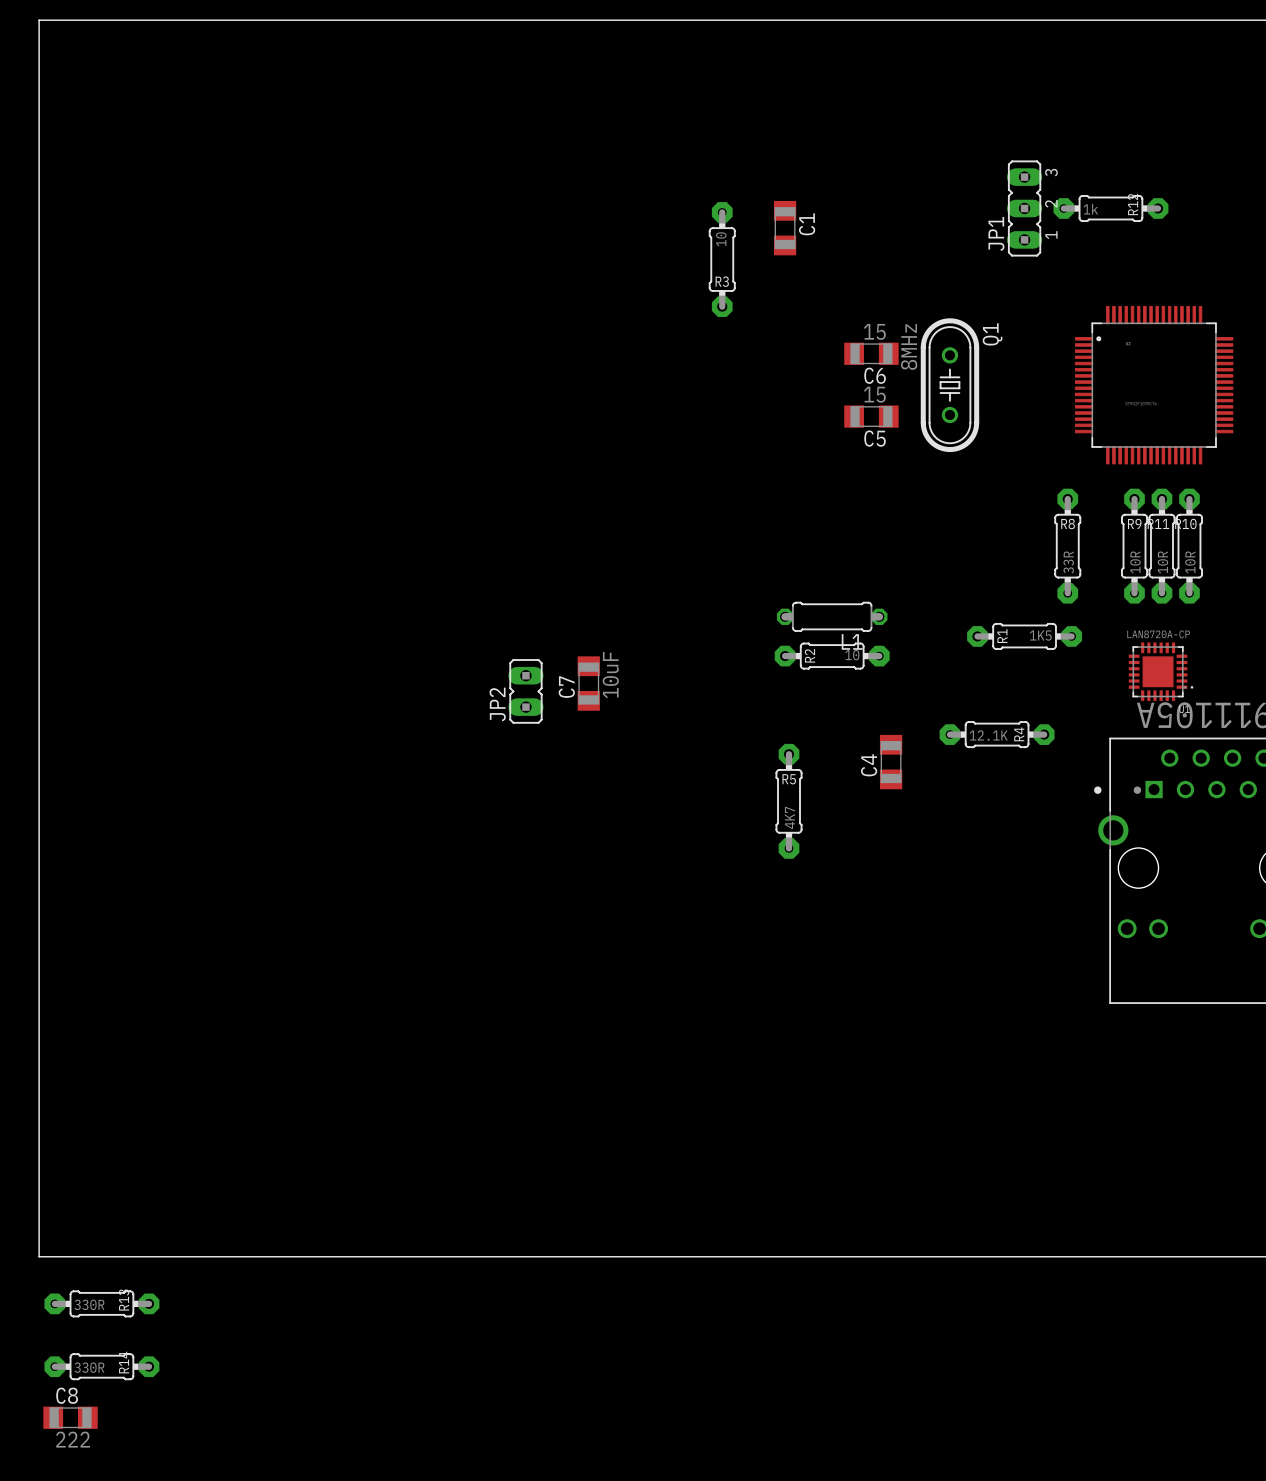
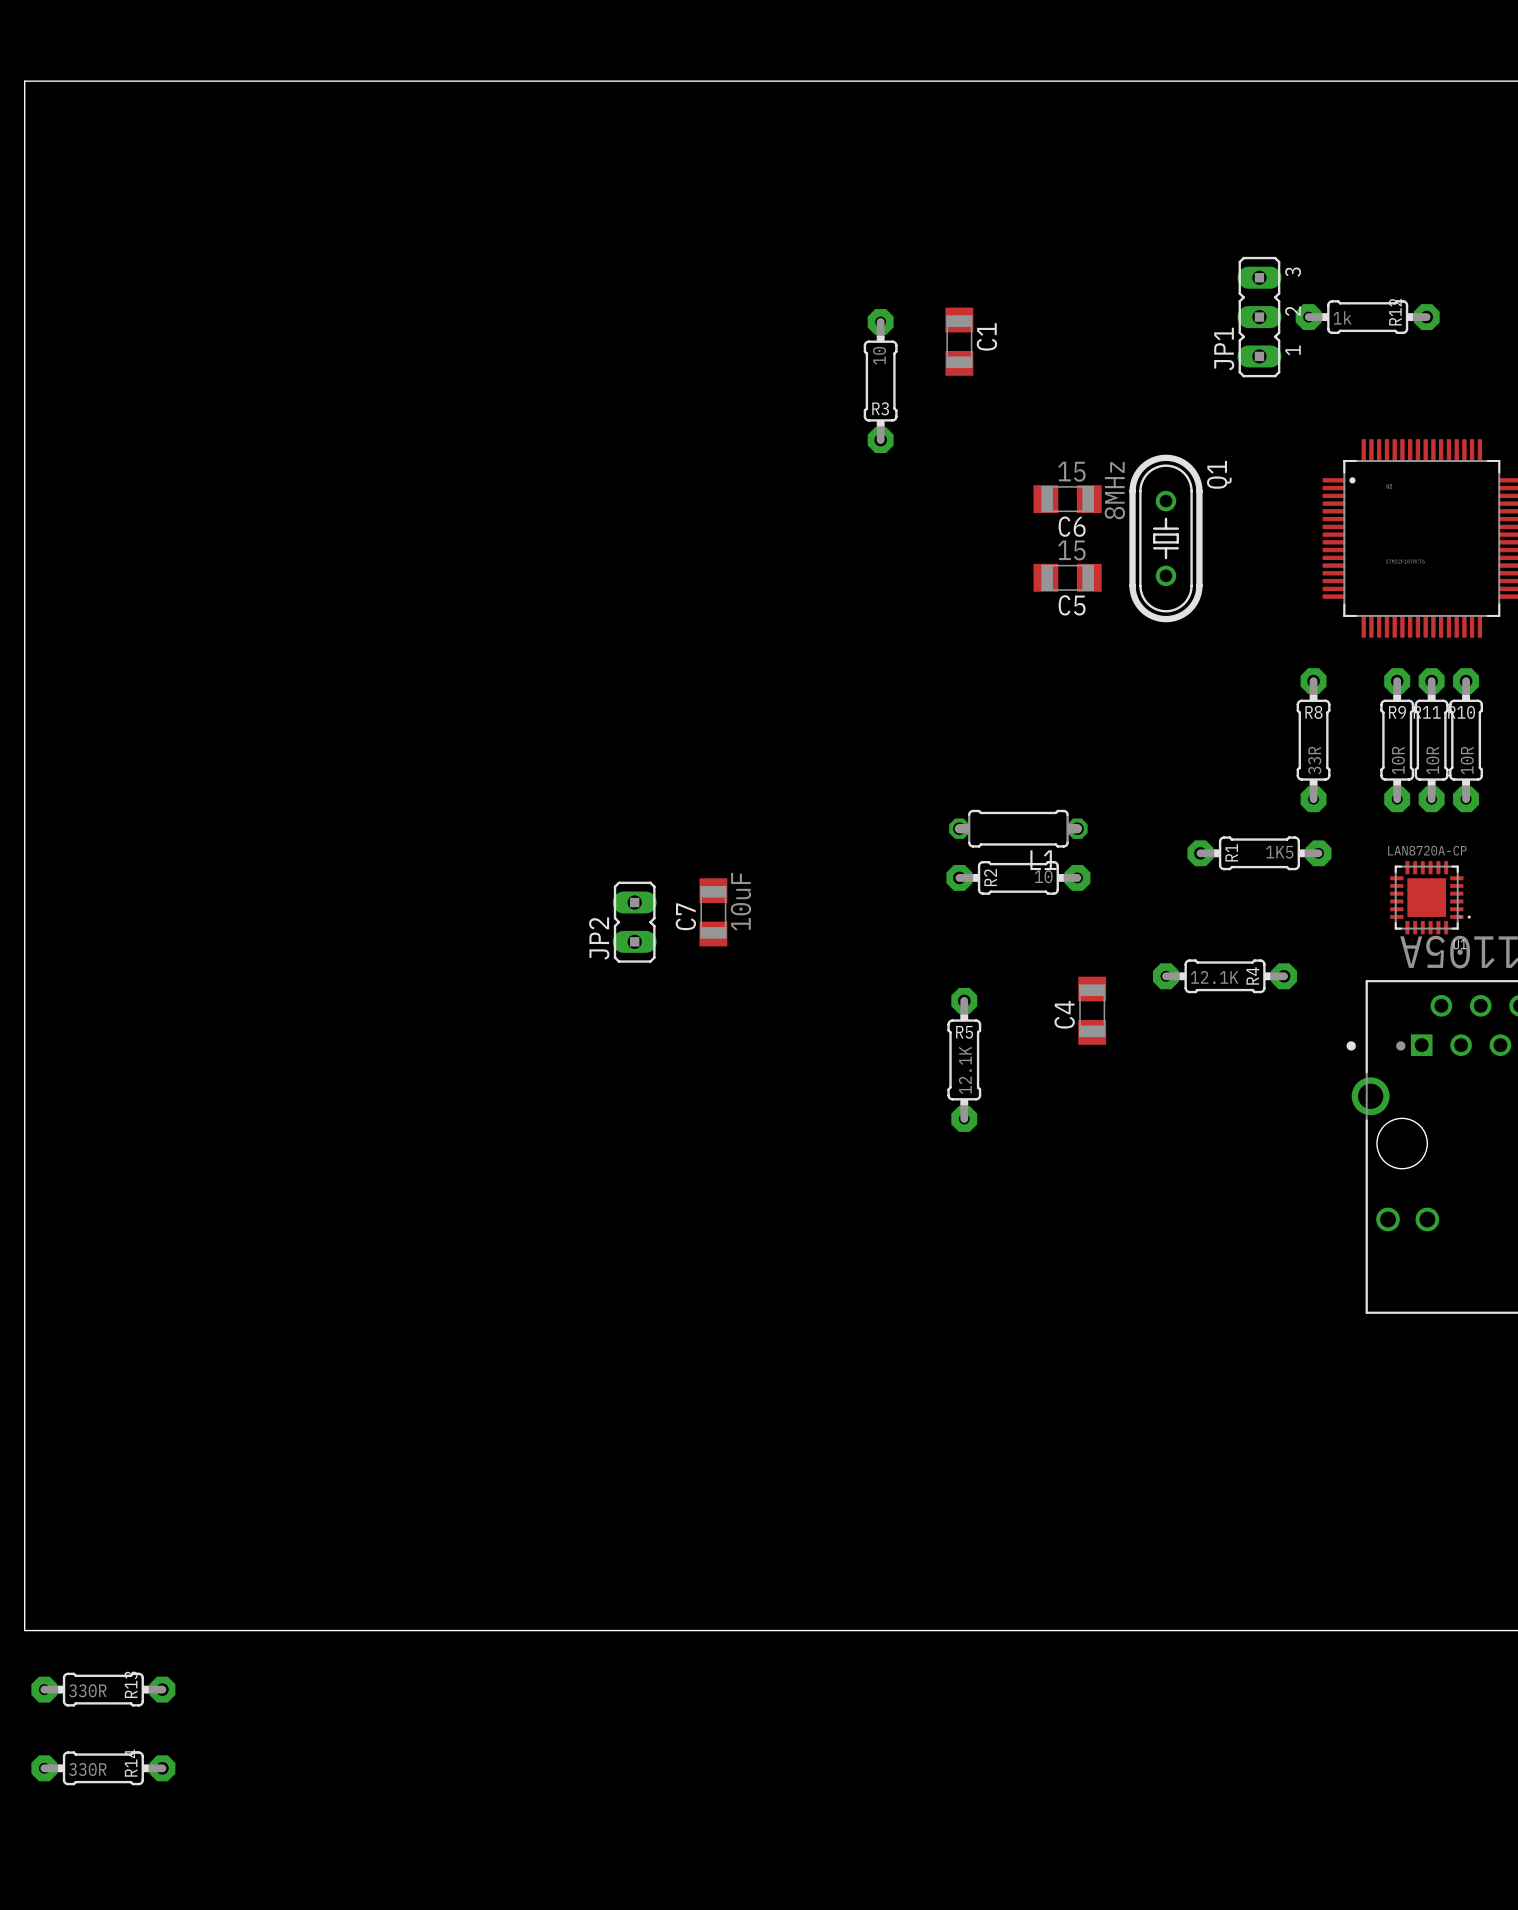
R5 value: 4K7 (789, 817) -> 12.1K (965, 1070)
C8: 222 (70, 1417) -> none

